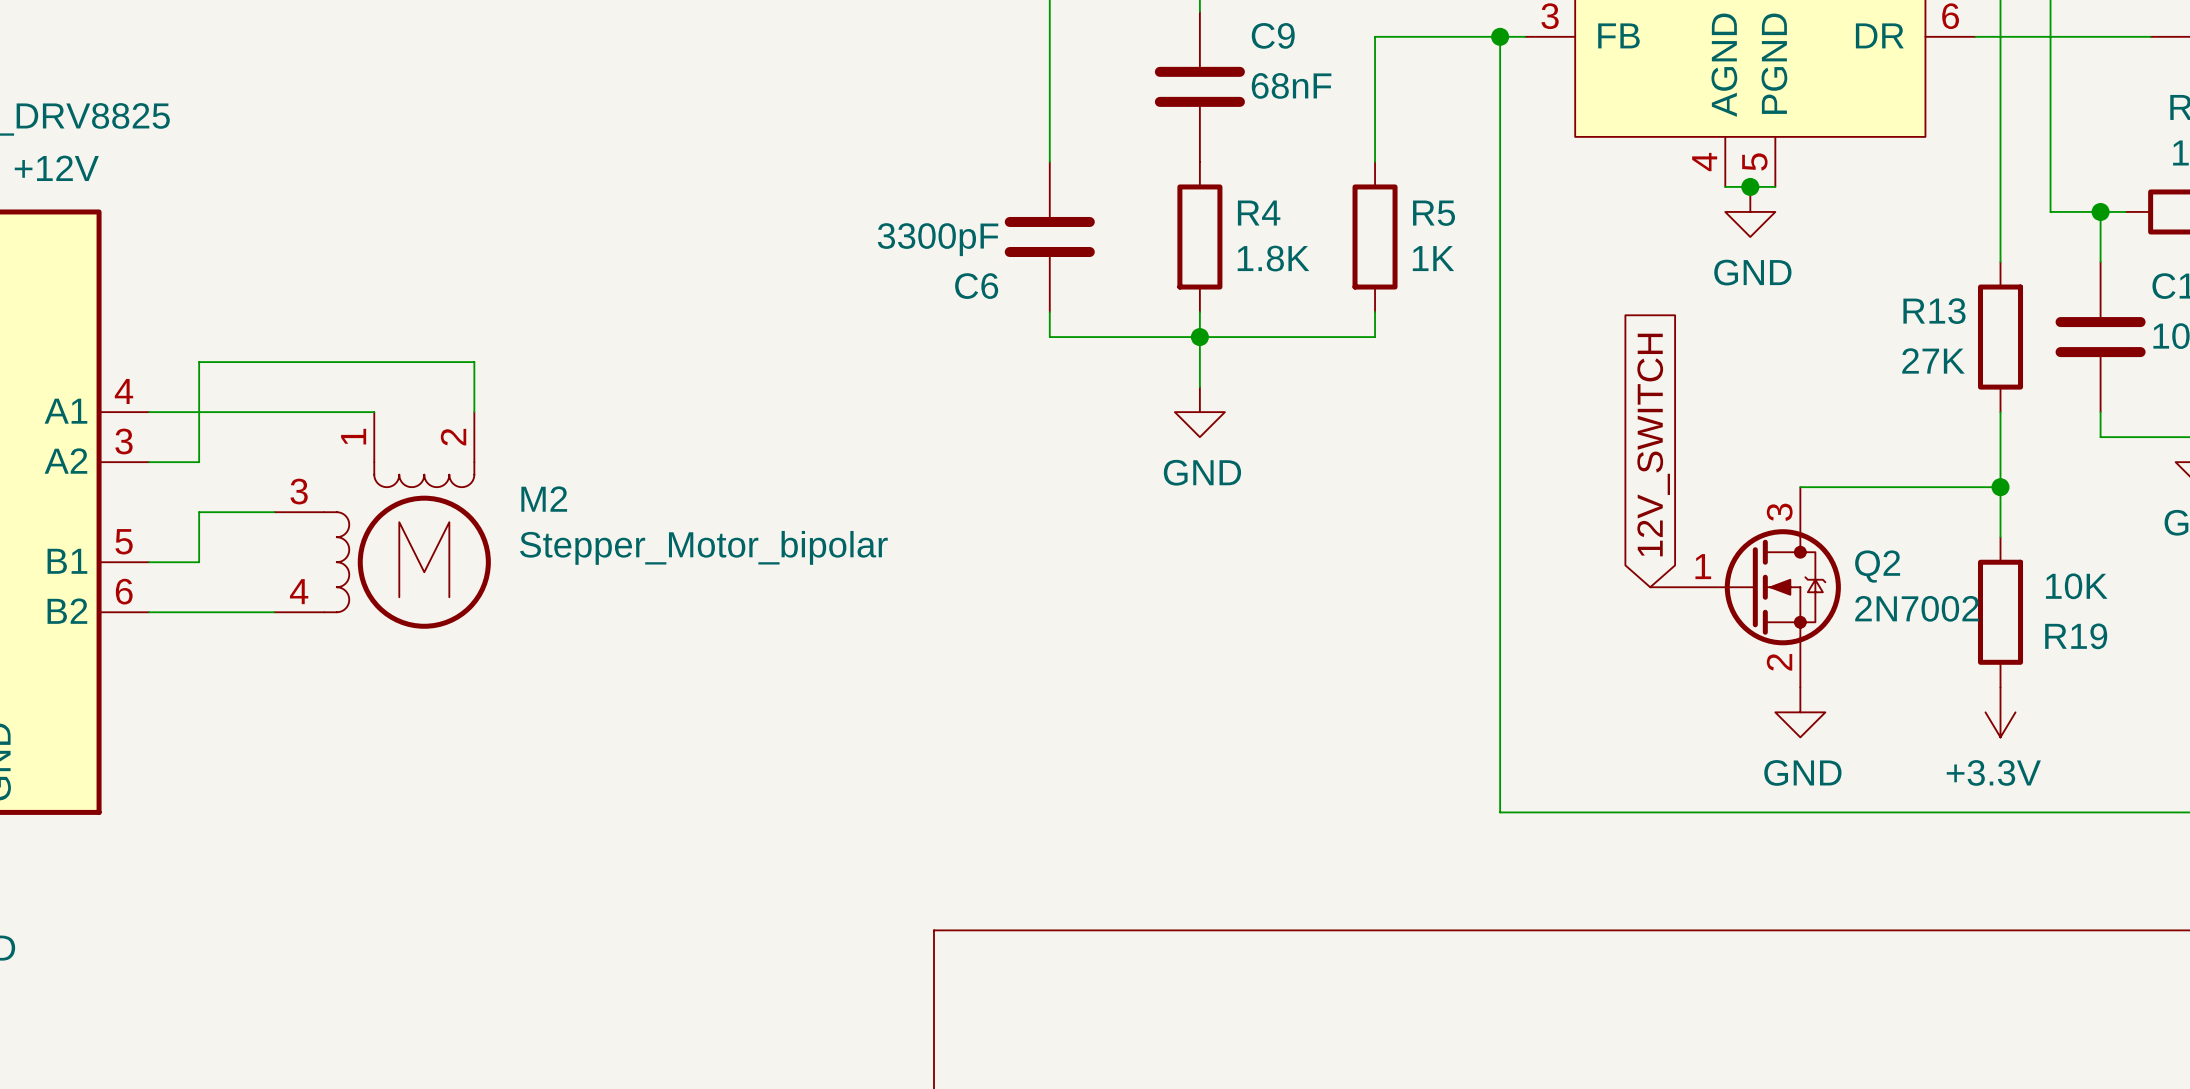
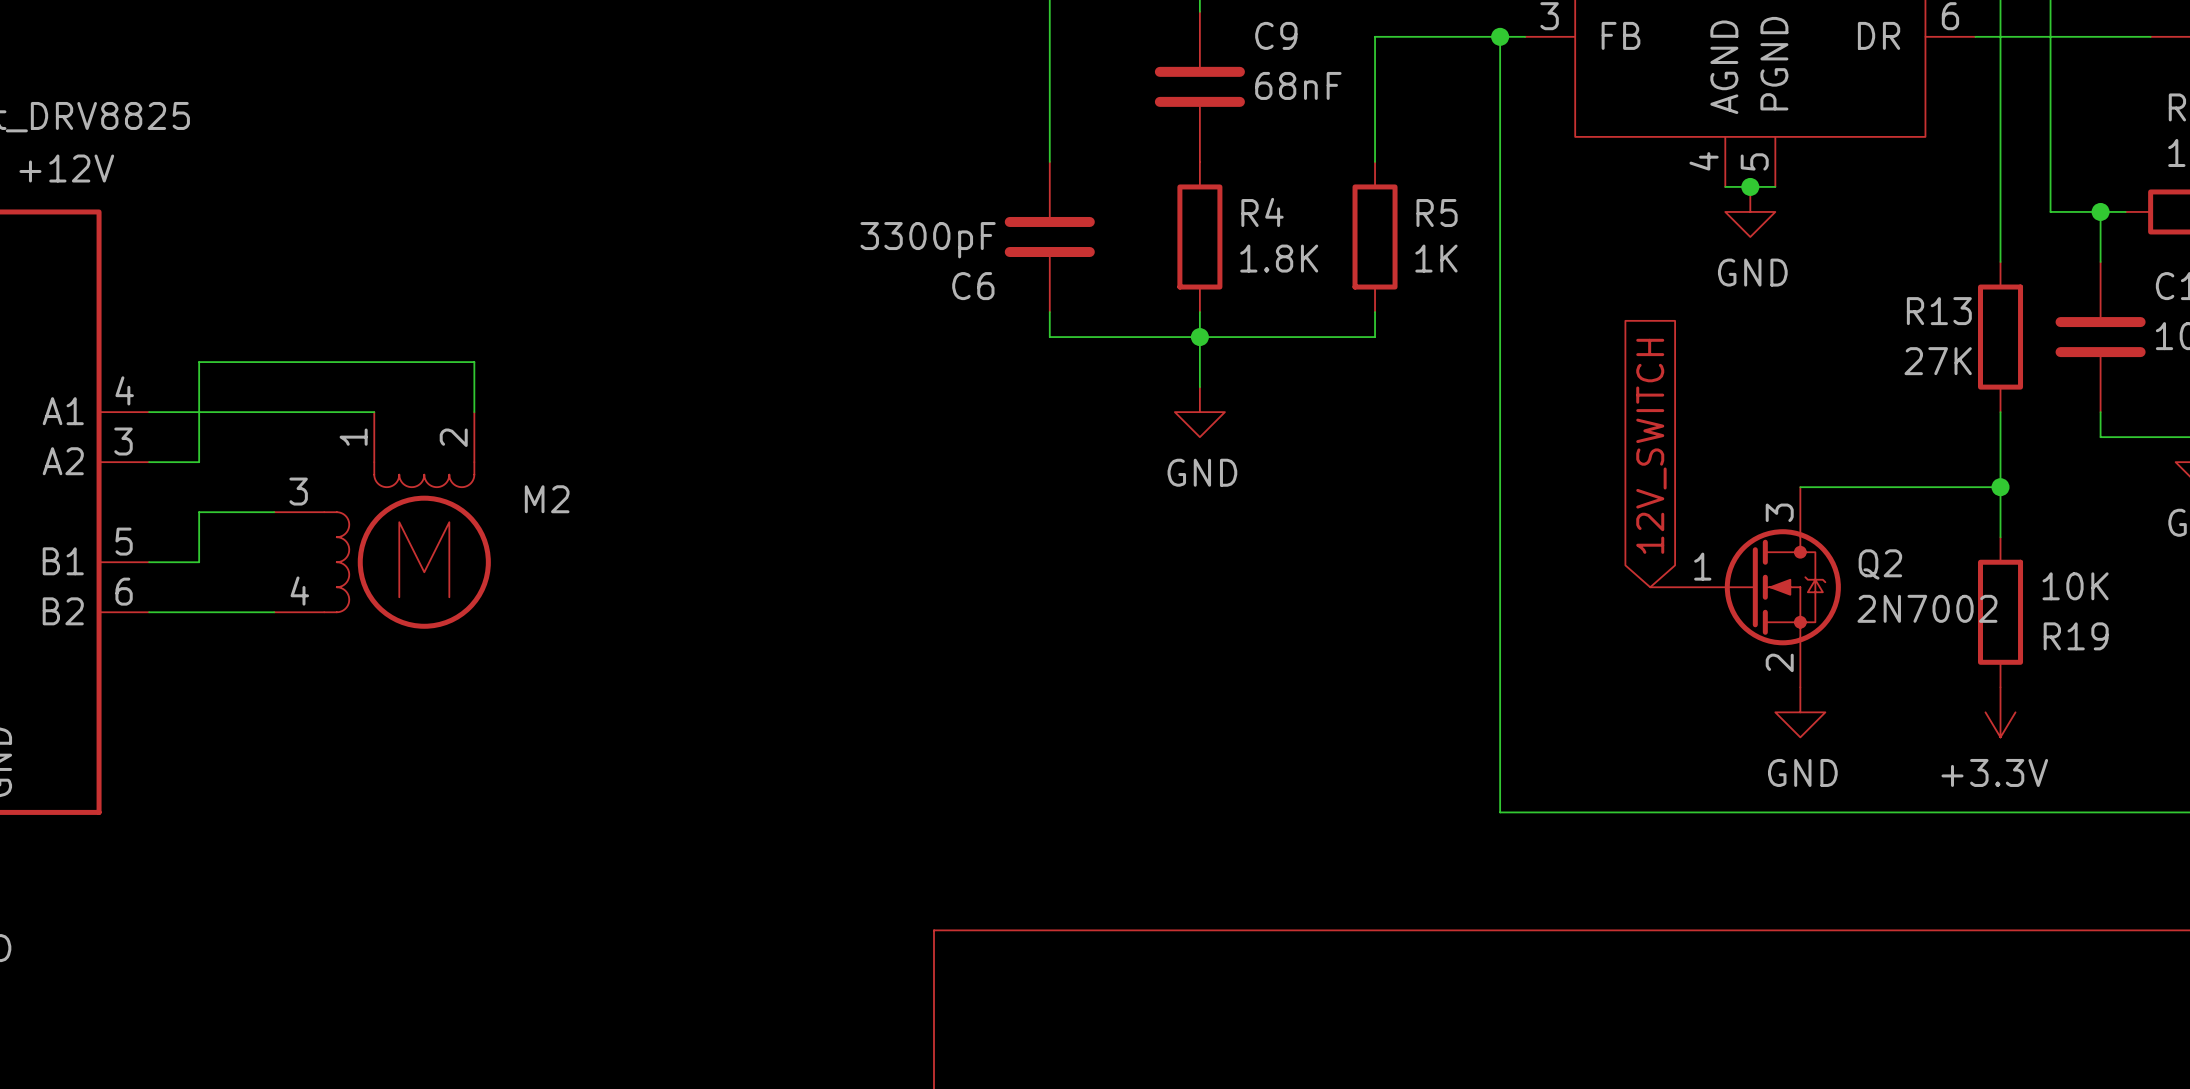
M2 value: Stepper_Motor_bipolar (703, 547) -> none

